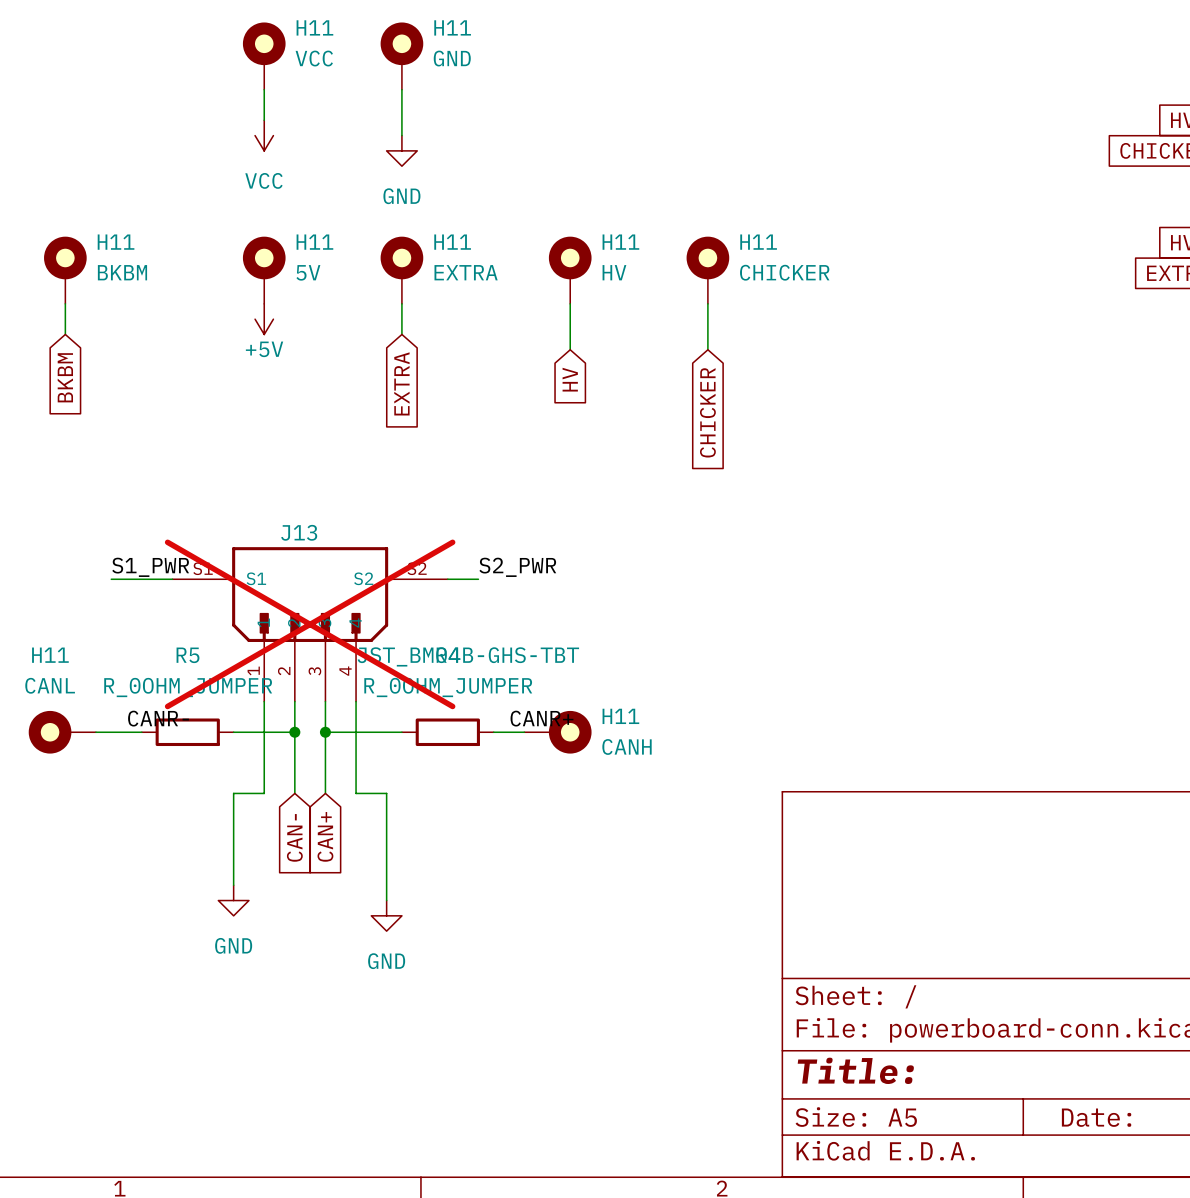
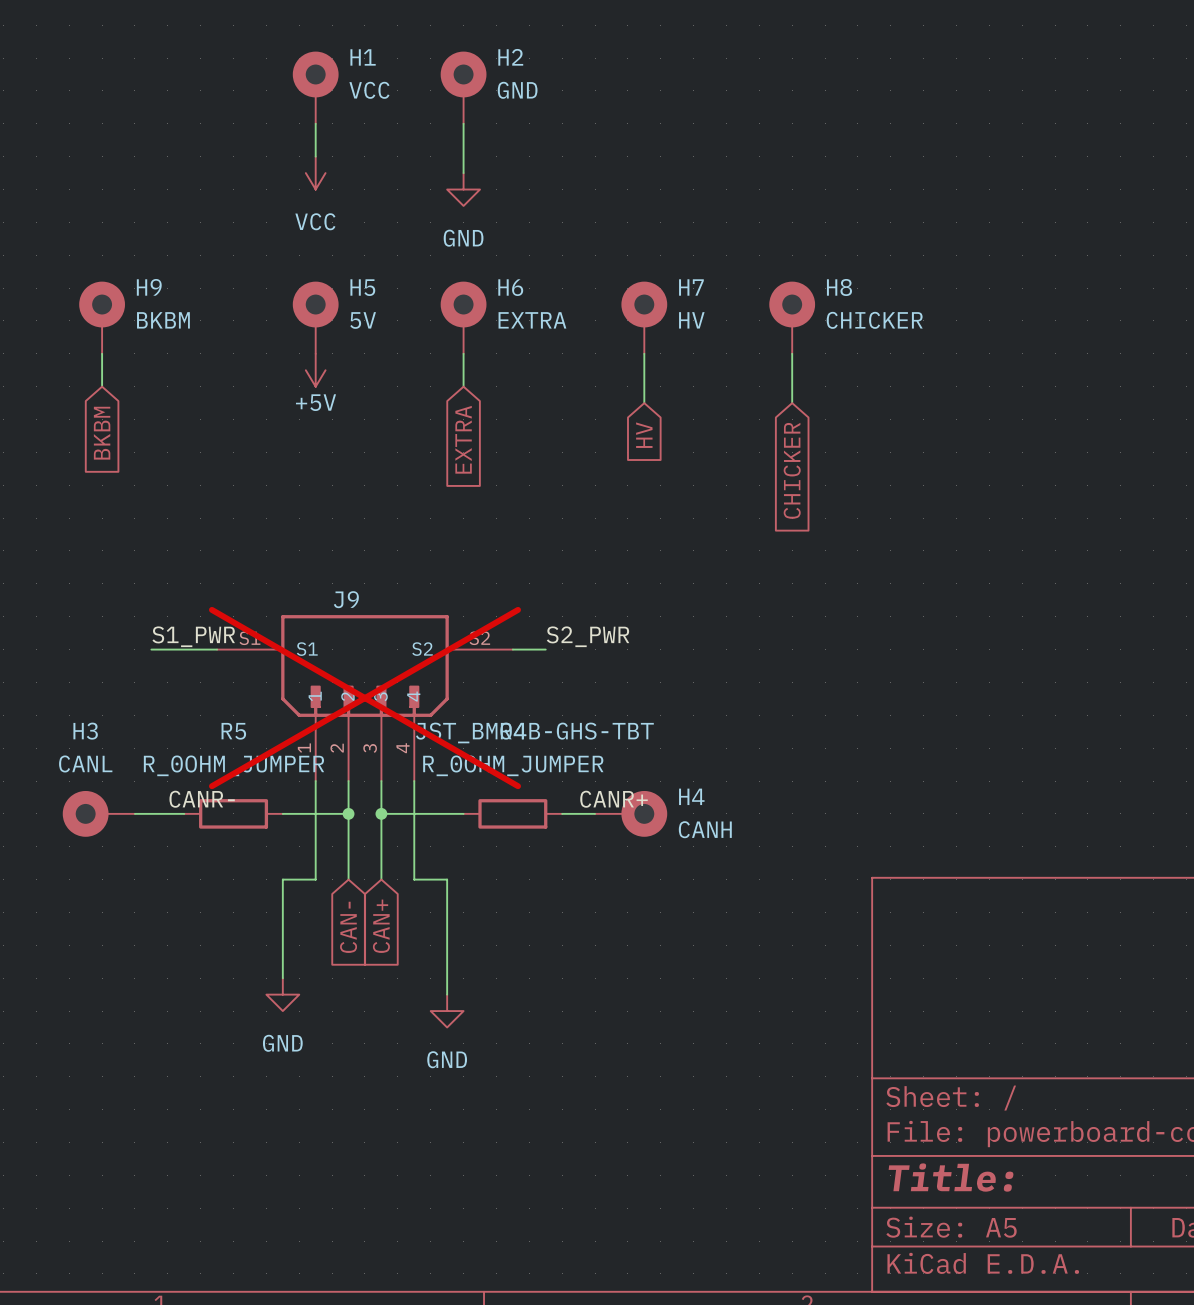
H11 name: H11 (314, 27) -> H1 (363, 57)
H11 name: H11 (452, 27) -> H2 (510, 57)
H11 name: H11 (116, 242) -> H9 (149, 287)
H11 name: H11 (314, 242) -> H5 (362, 287)
H11 name: H11 (452, 242) -> H6 (510, 287)
H11 name: H11 (620, 242) -> H7 (691, 287)
H11 name: H11 (758, 242) -> H8 (839, 287)
J13 name: J13 (299, 532) -> J9 (346, 599)
H11 name: H11 (50, 655) -> H3 (85, 731)
H11 name: H11 (620, 716) -> H4 (691, 796)

